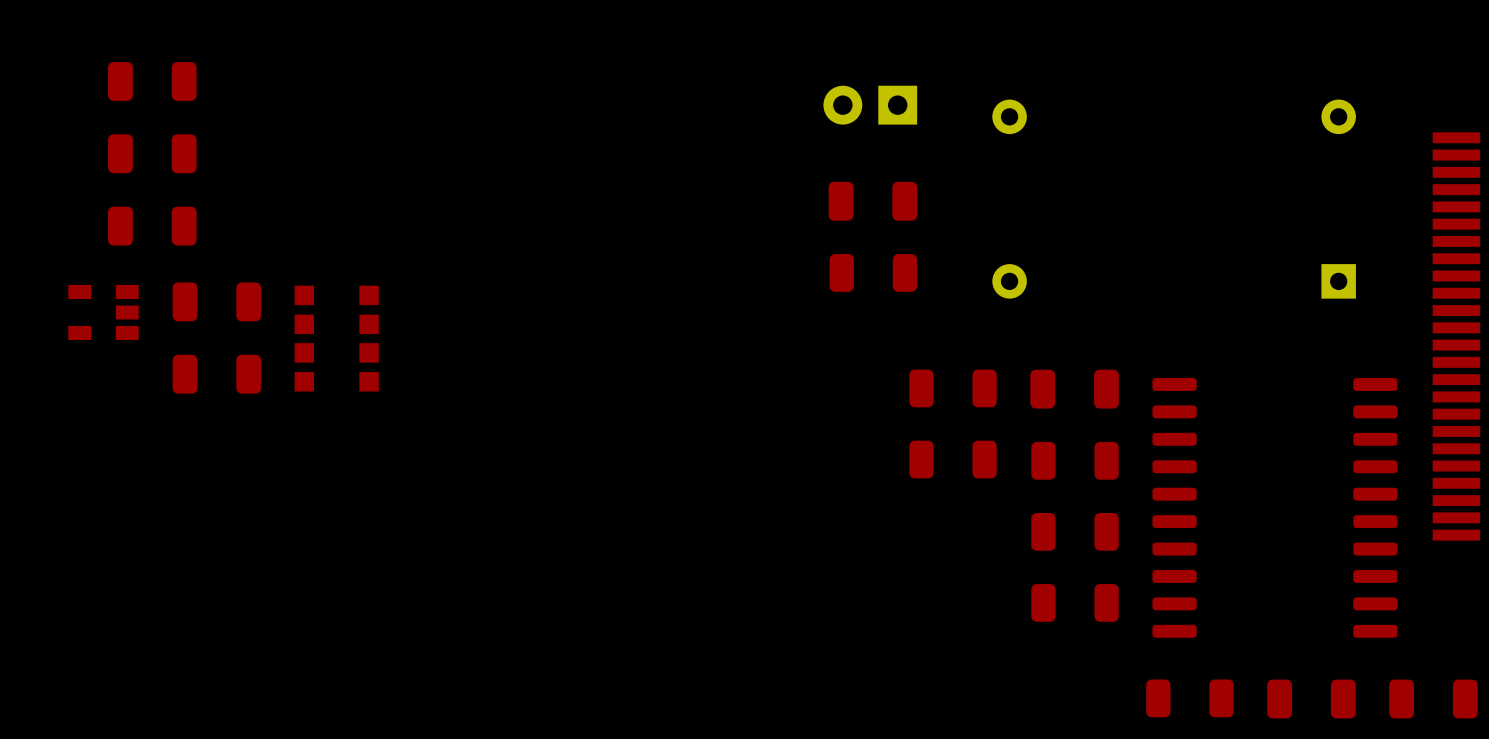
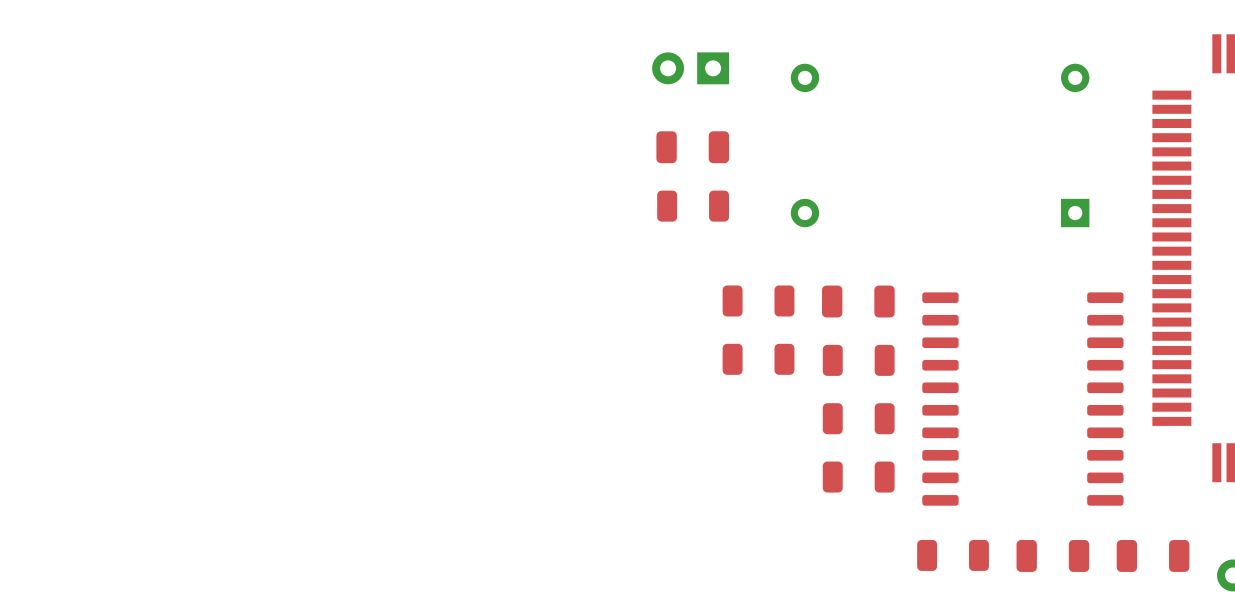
part: (152, 81) -> none
part: (152, 153) -> none
part: (152, 226) -> none
part: (216, 301) -> none
part: (103, 312) -> none
part: (336, 338) -> none
part: (216, 374) -> none

